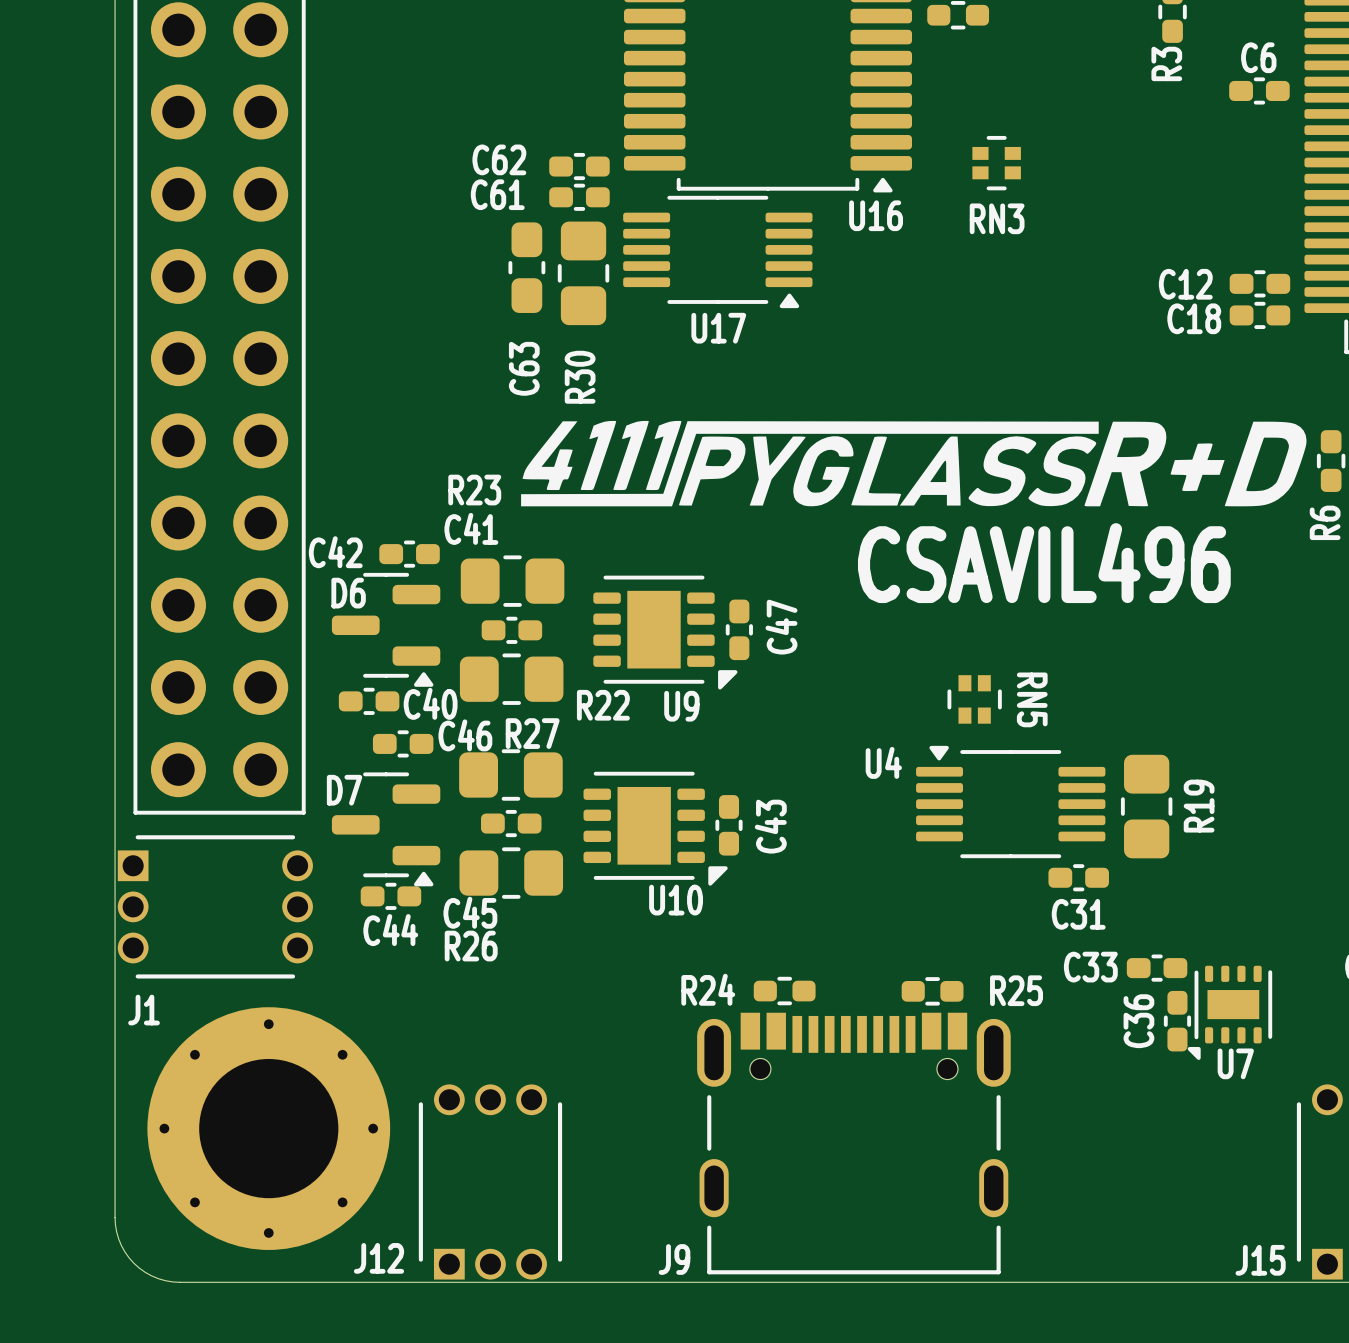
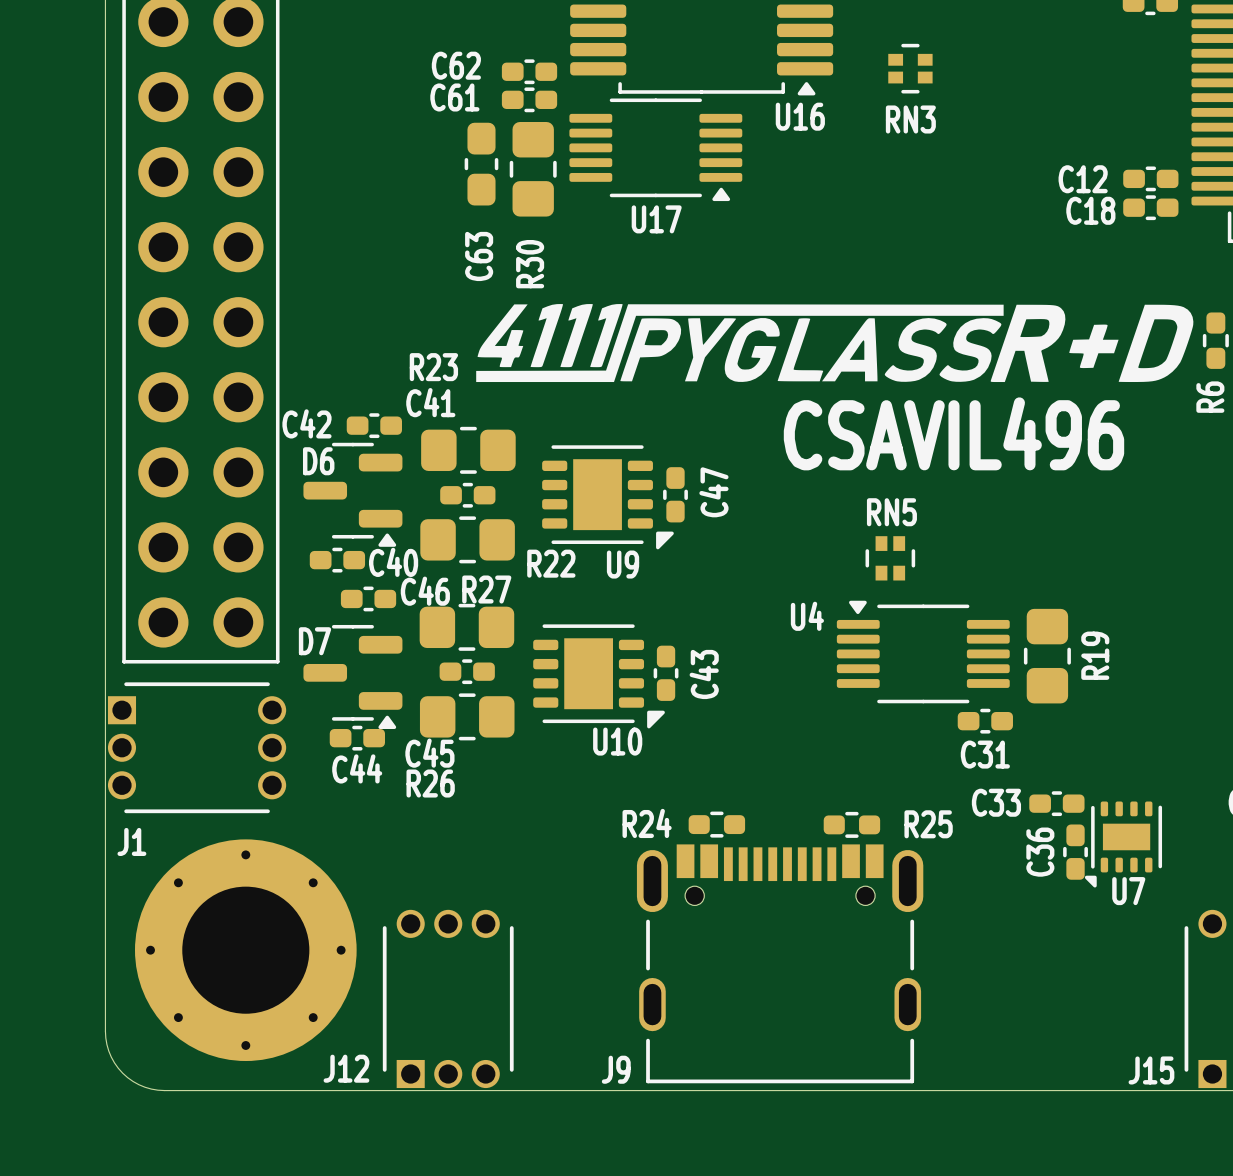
RN5 name rotation: 0° (1032, 699) -> 90° counterclockwise (891, 512)
RN5 name position: RN5 (1032, 699) -> RN5 (891, 512)

